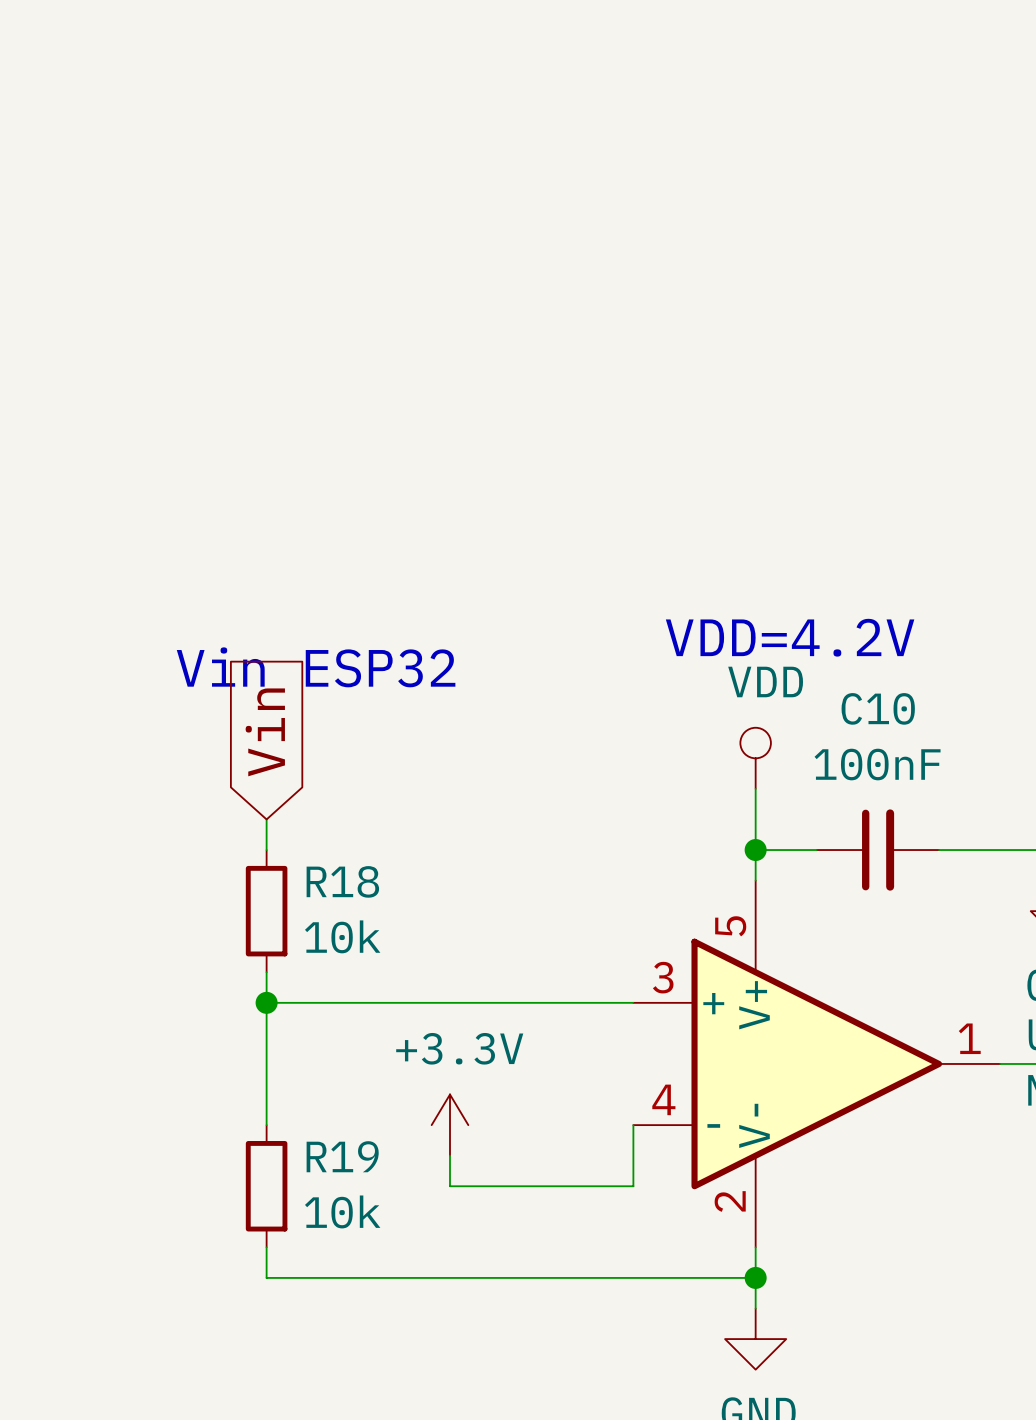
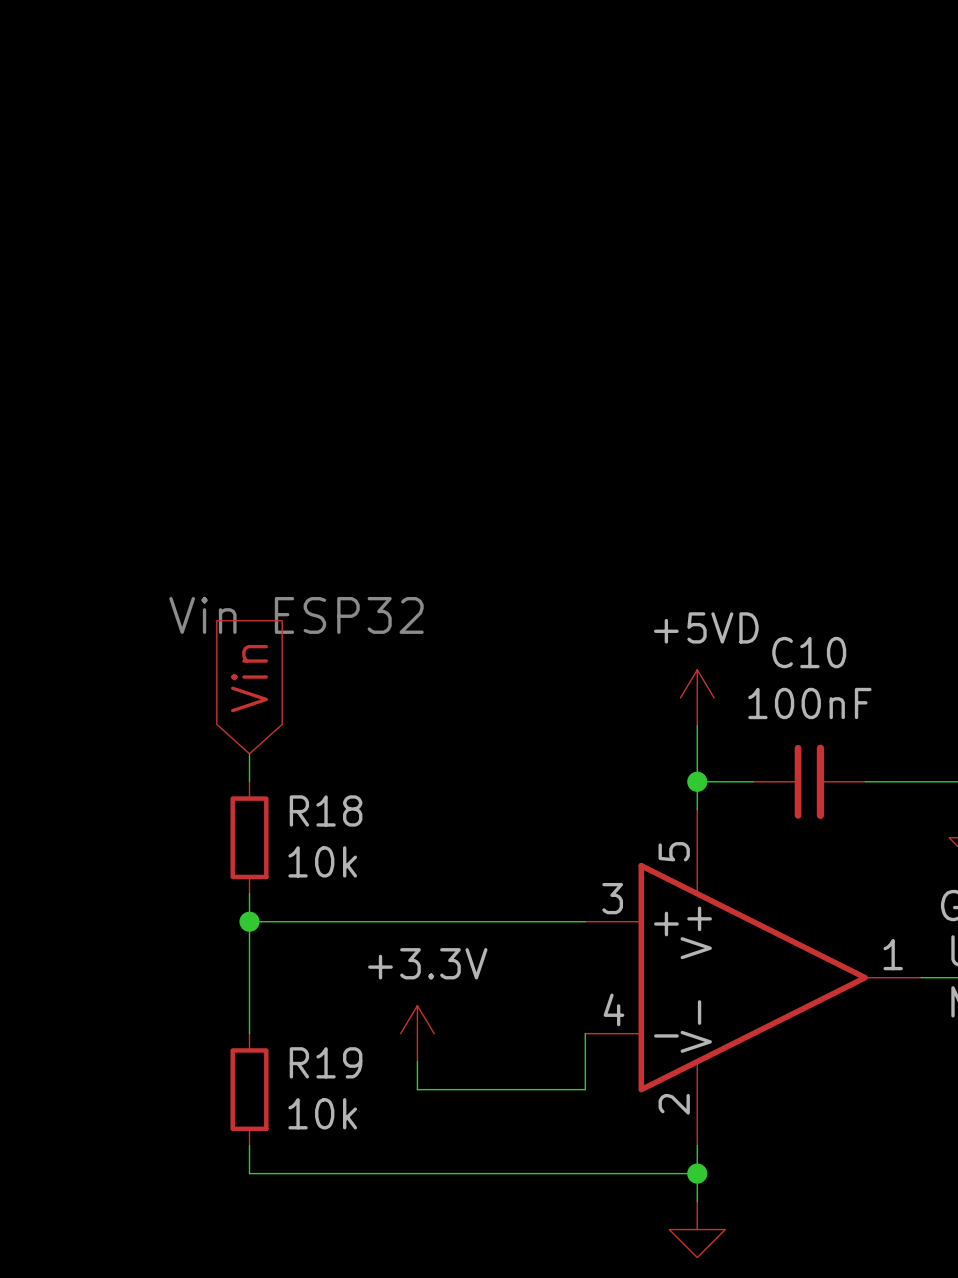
text: VDD=4.2V (790, 637) -> none
power symbol: VDD (755, 758) -> +5VD (697, 697)

